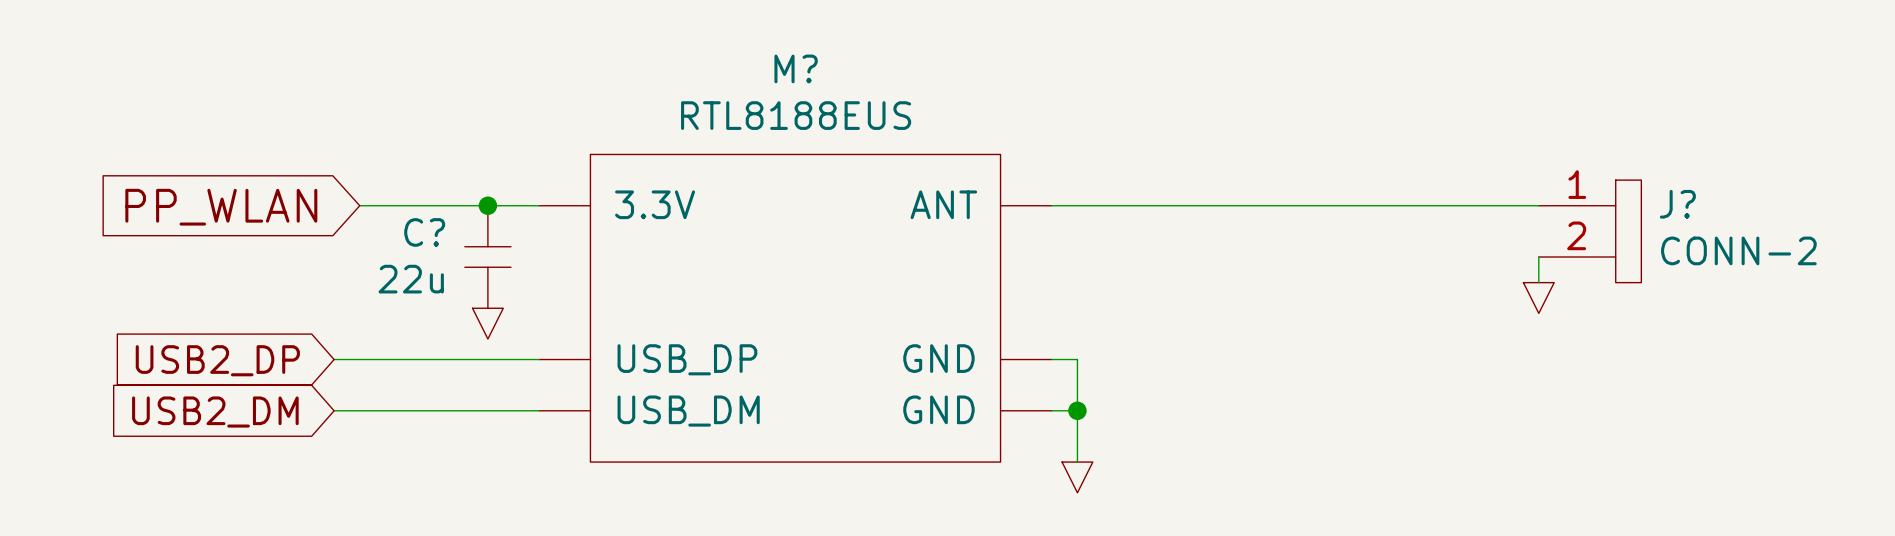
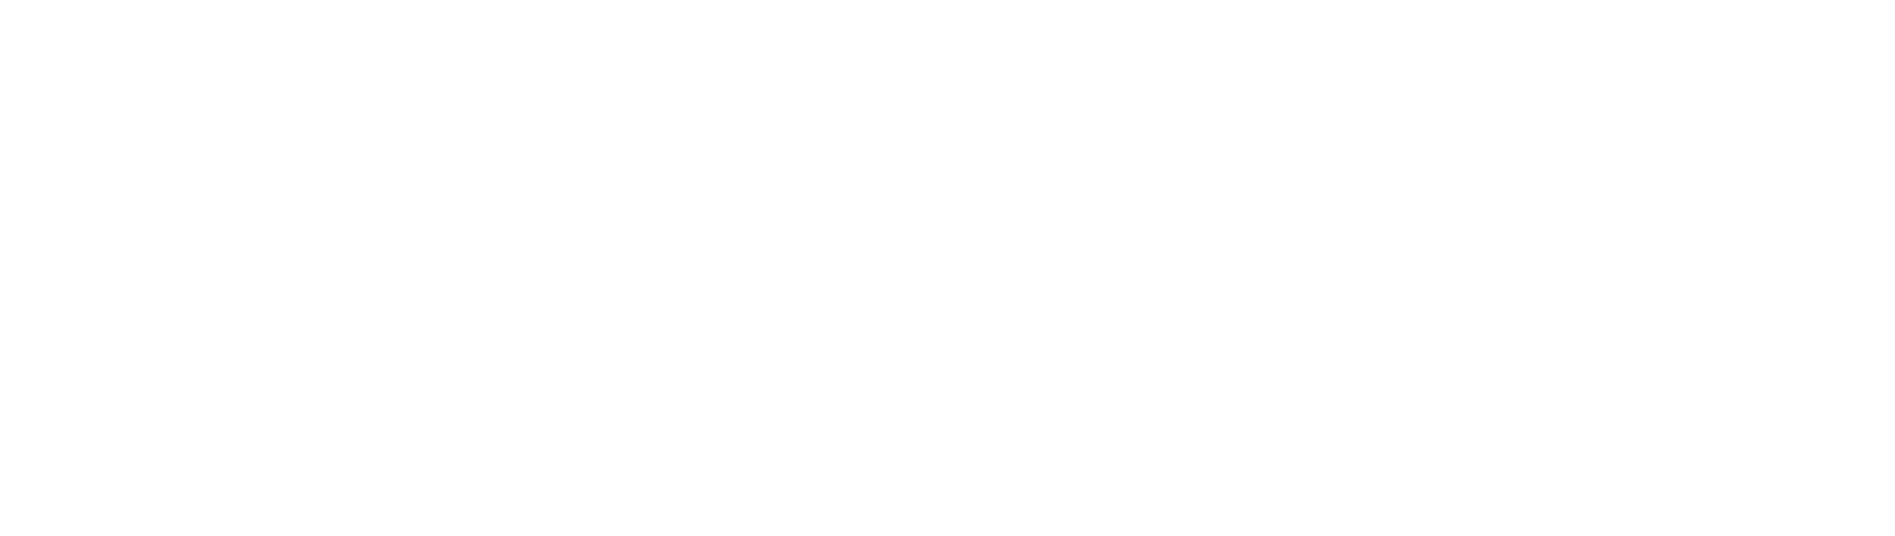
wire: (359, 205) (539, 205) -> none
junction: (487, 205) -> none
wire: (1051, 205) (1538, 205) -> none
global label: PP_WLAN (221, 207) -> none
J?: CONN-2 (1590, 231) -> none
C?: 22u (487, 257) -> none
wire: (1538, 257) (1538, 282) -> none
power symbol: (1538, 298) -> none
M?: RTL8188EUS (795, 308) -> none
power symbol: (487, 323) -> none
wire: (334, 359) (539, 359) -> none
wire: (1051, 359) (1077, 359) (1077, 462) -> none
global label: USB2_DP (217, 360) -> none
wire: (334, 410) (539, 410) -> none
wire: (1051, 410) (1077, 410) -> none
junction: (1077, 410) -> none
global label: USB2_DM (215, 412) -> none
power symbol: (1077, 477) -> none

